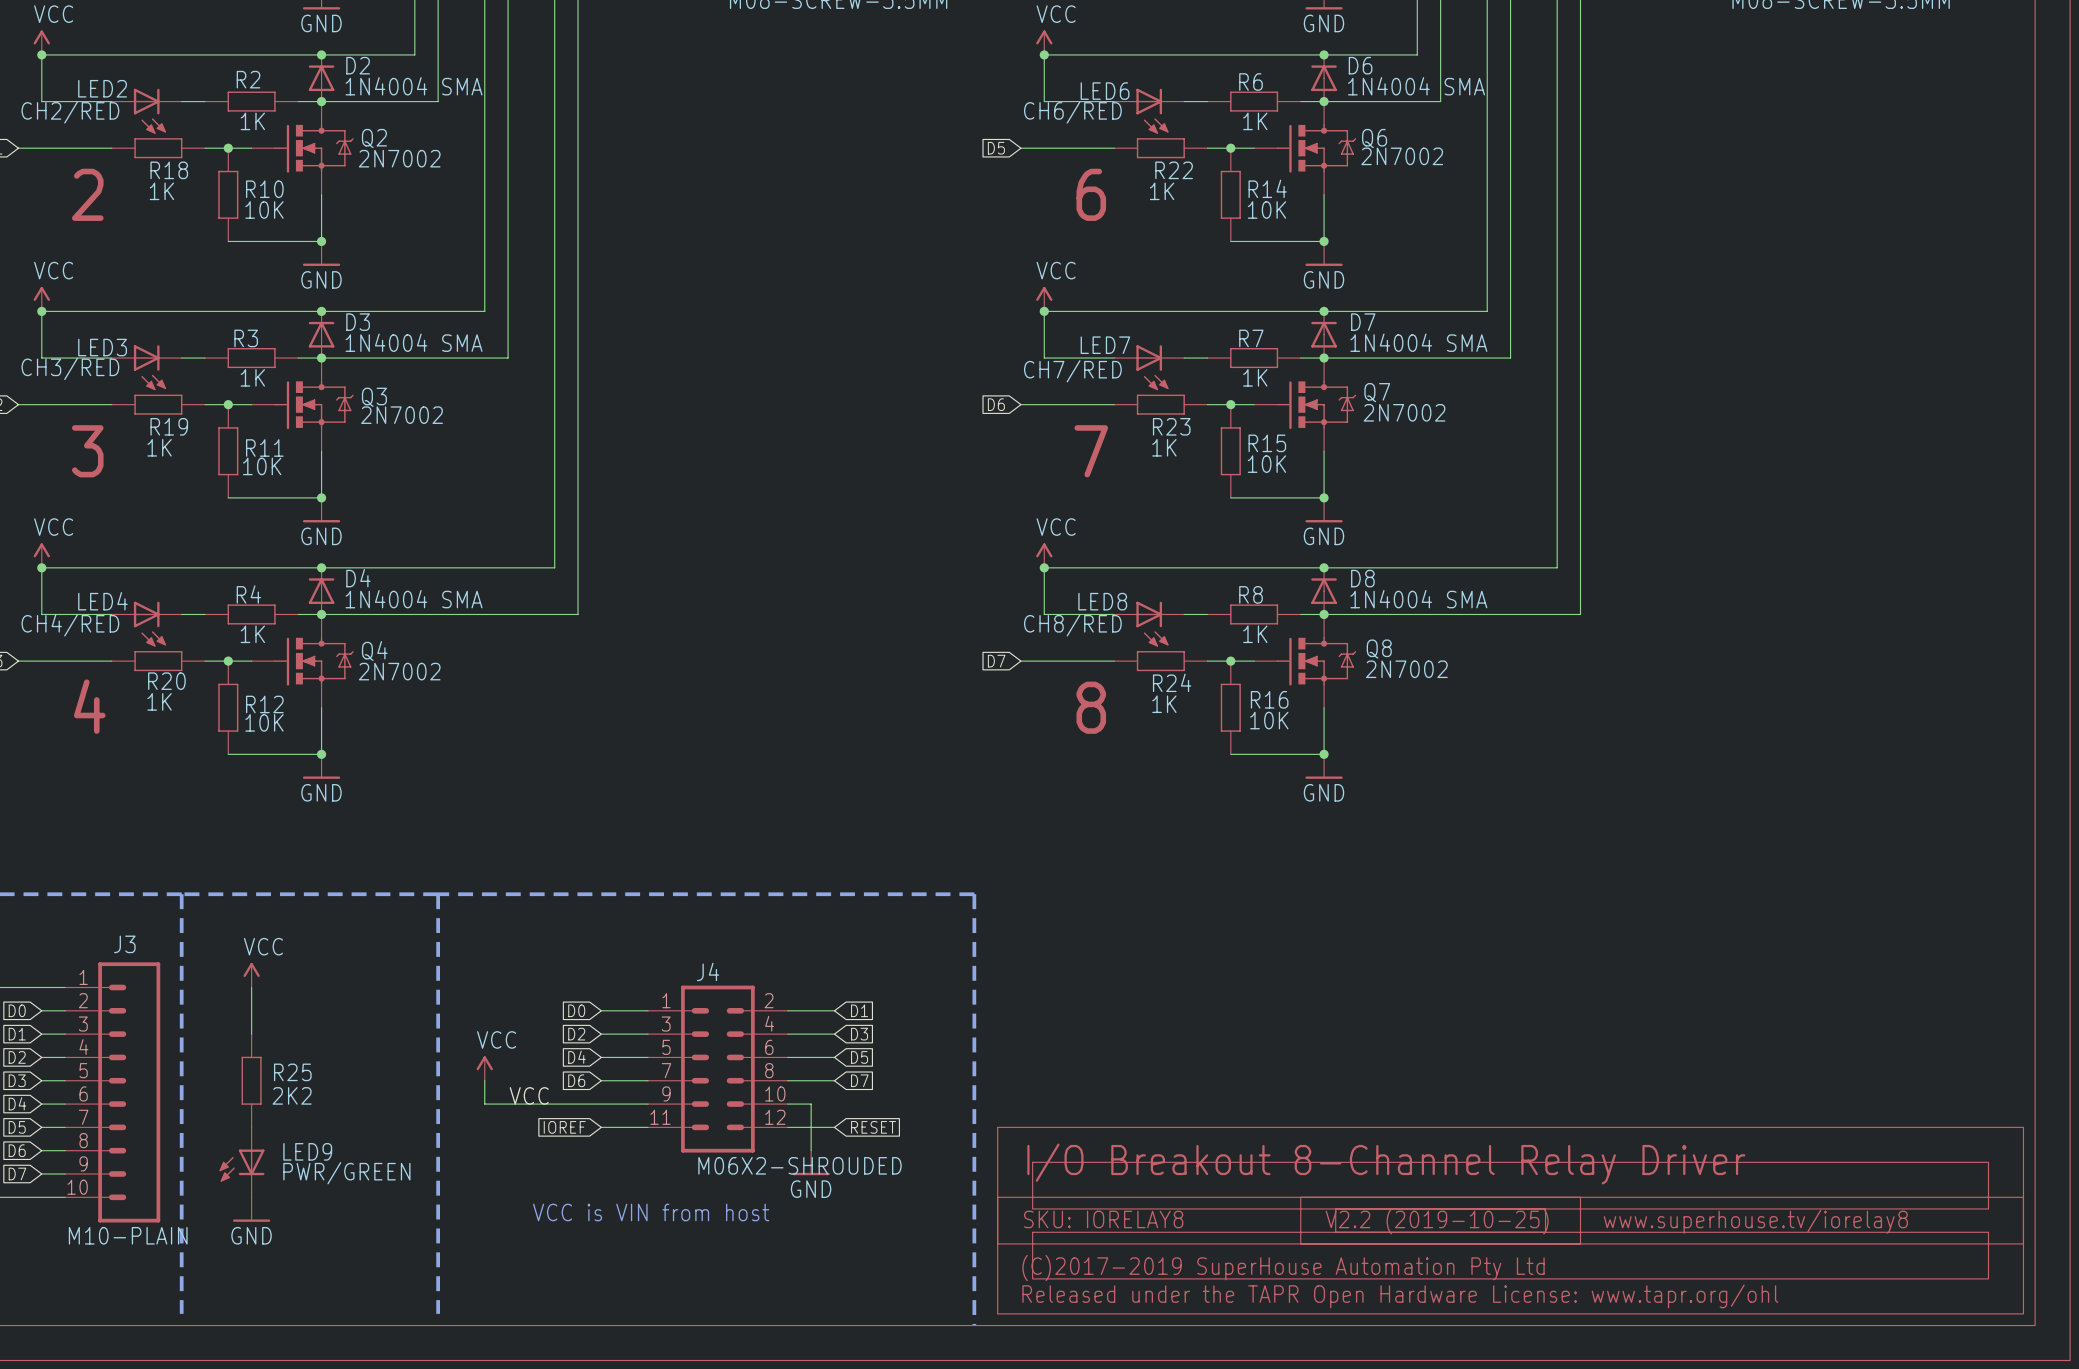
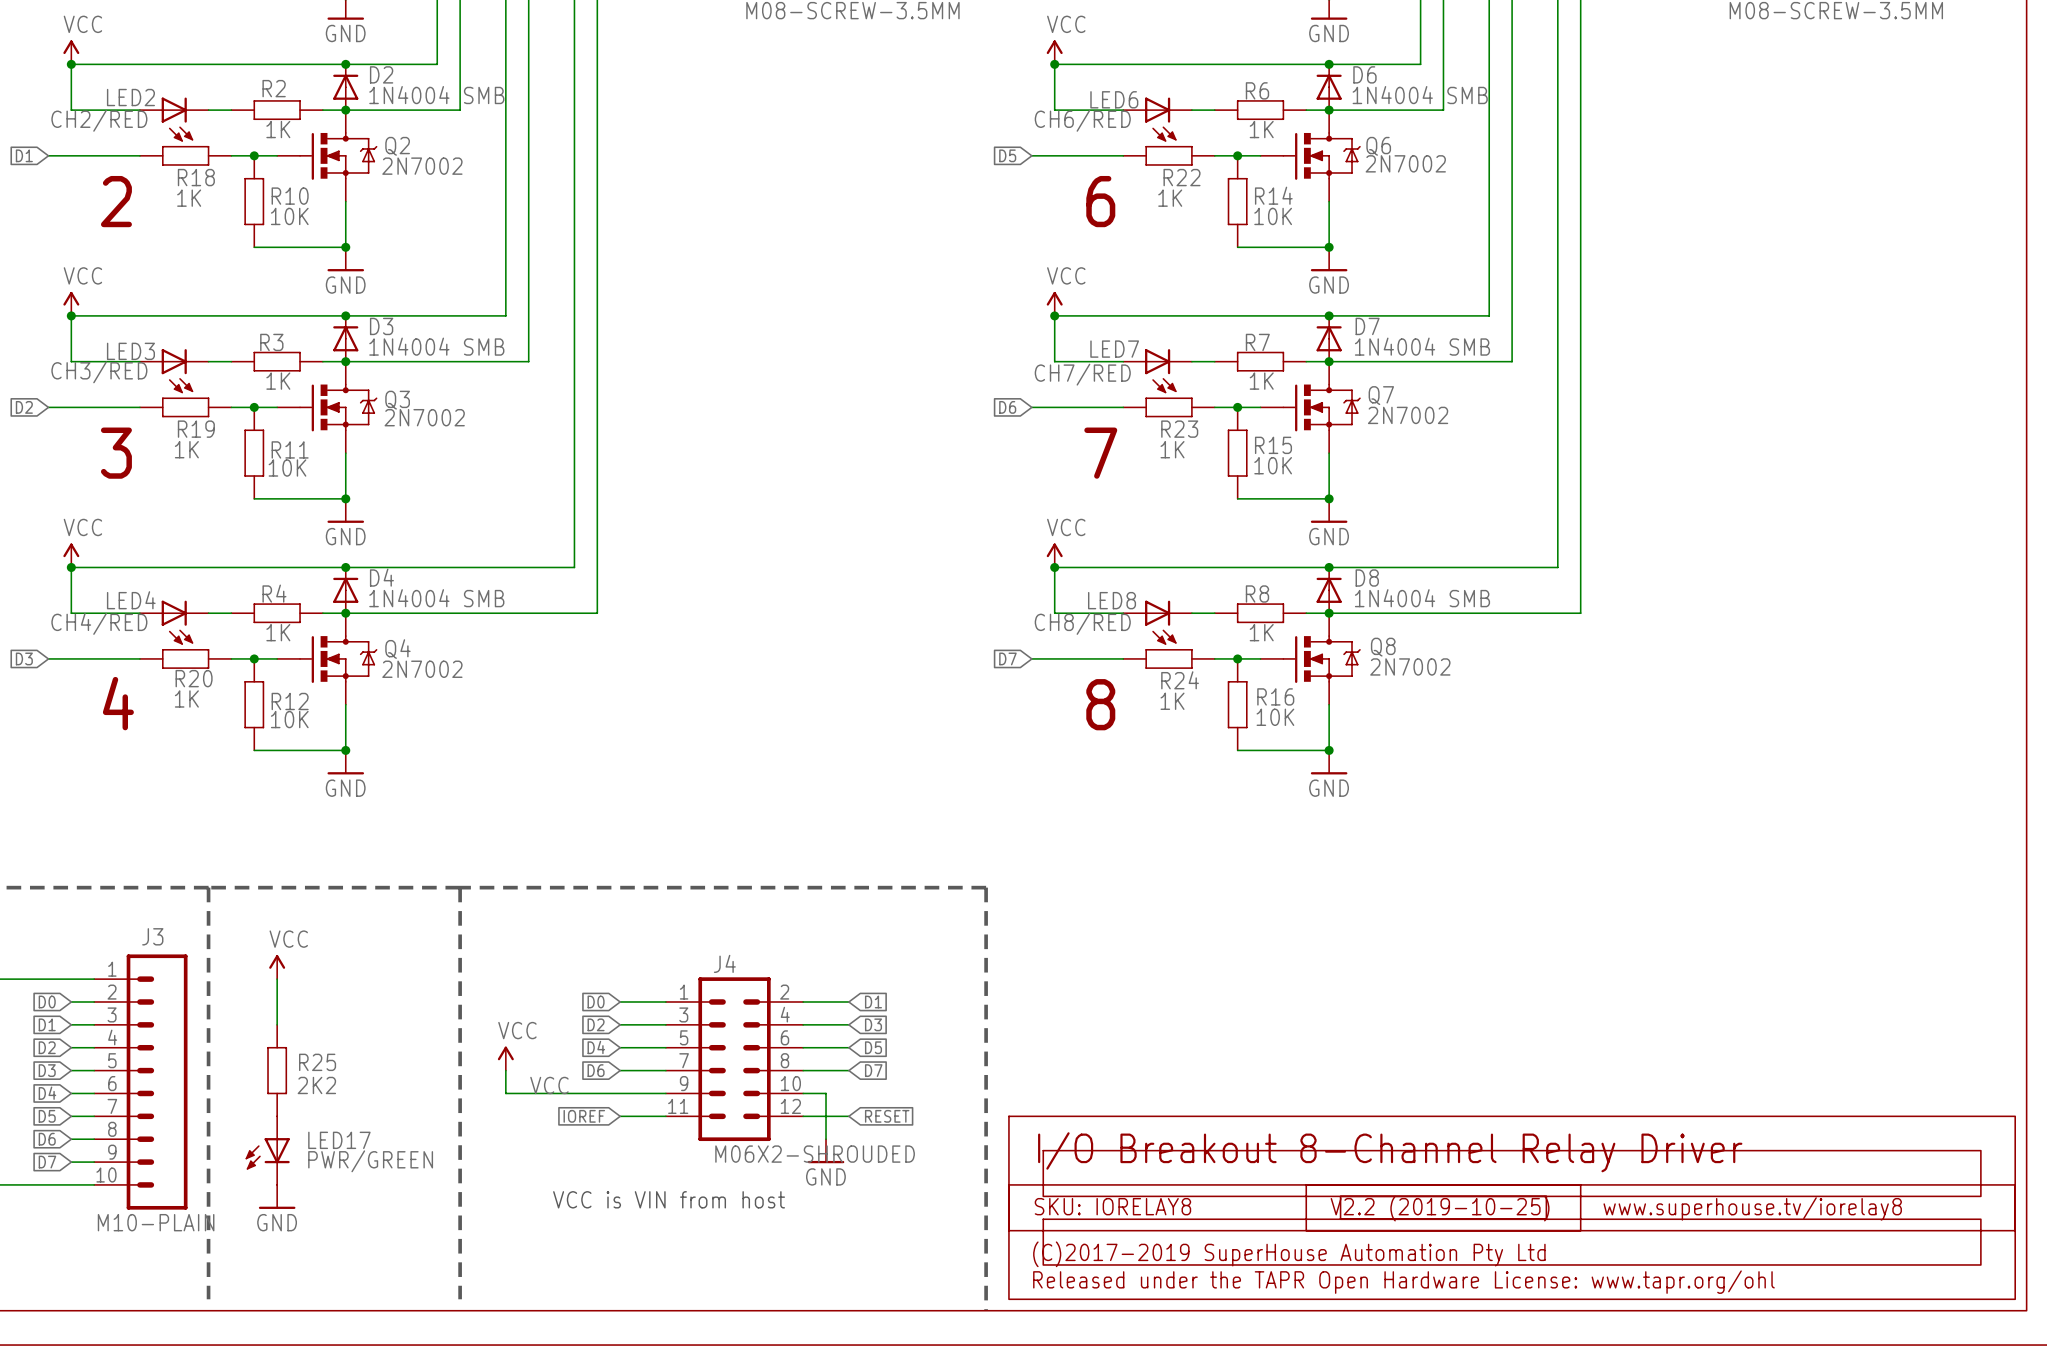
D2 value: 1N4004 SMA (414, 86) -> 1N4004 SMB (436, 95)
D6 value: 1N4004 SMA (1416, 86) -> 1N4004 SMB (1420, 95)
D3 value: 1N4004 SMA (414, 342) -> 1N4004 SMB (436, 346)
D7 value: 1N4004 SMA (1418, 342) -> 1N4004 SMB (1422, 346)
D4 value: 1N4004 SMA (414, 599) -> 1N4004 SMB (436, 598)
D8 value: 1N4004 SMA (1418, 599) -> 1N4004 SMB (1422, 598)
LED9 name: LED9 (307, 1151) -> LED17 (339, 1140)

